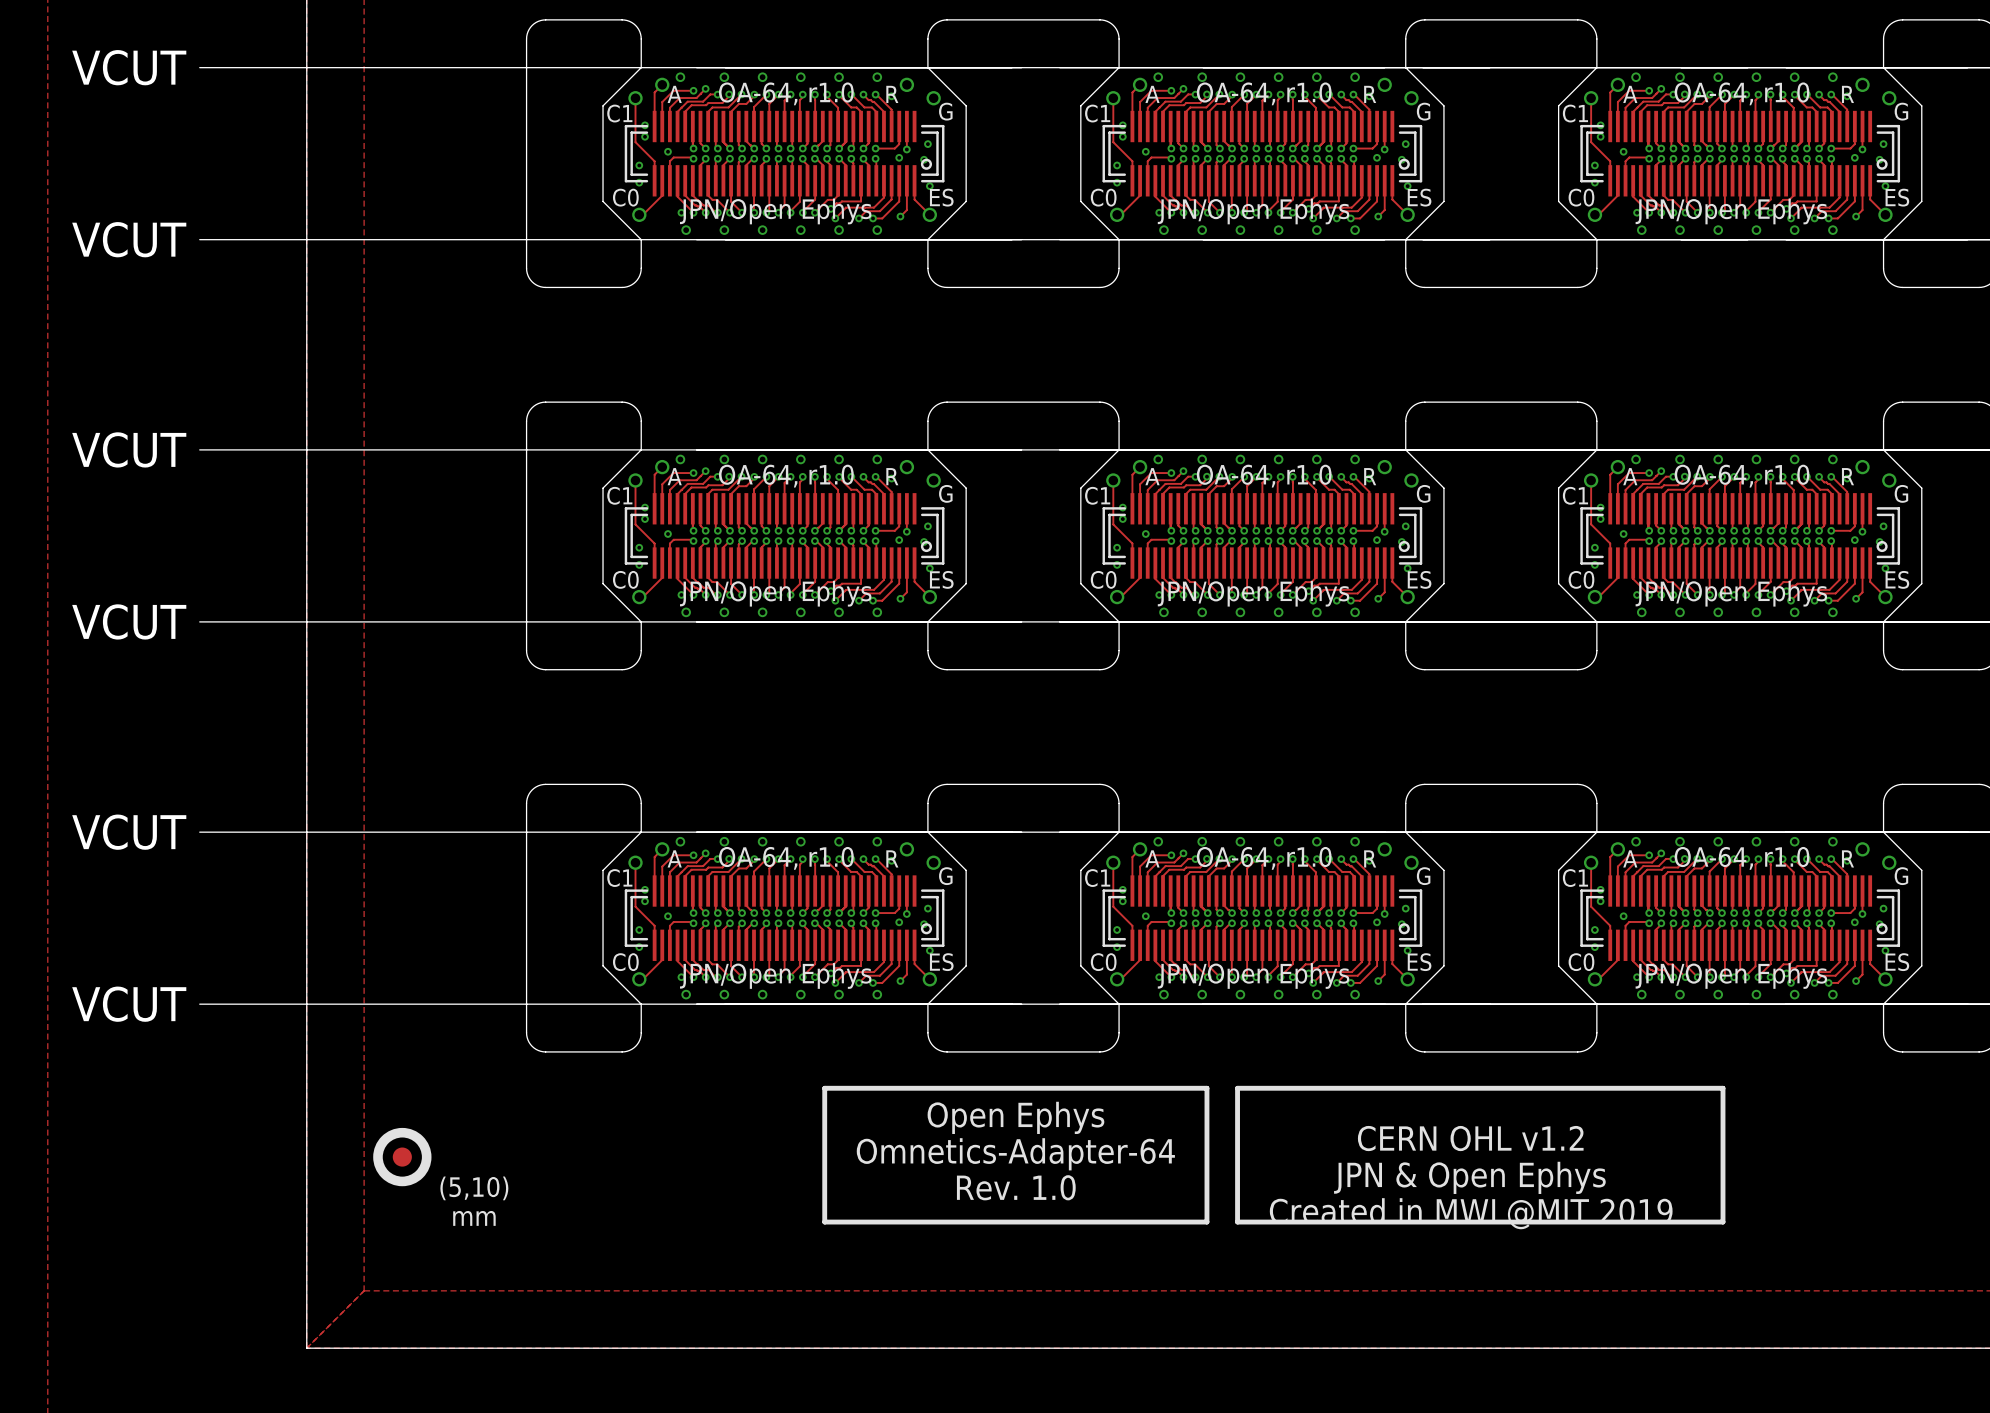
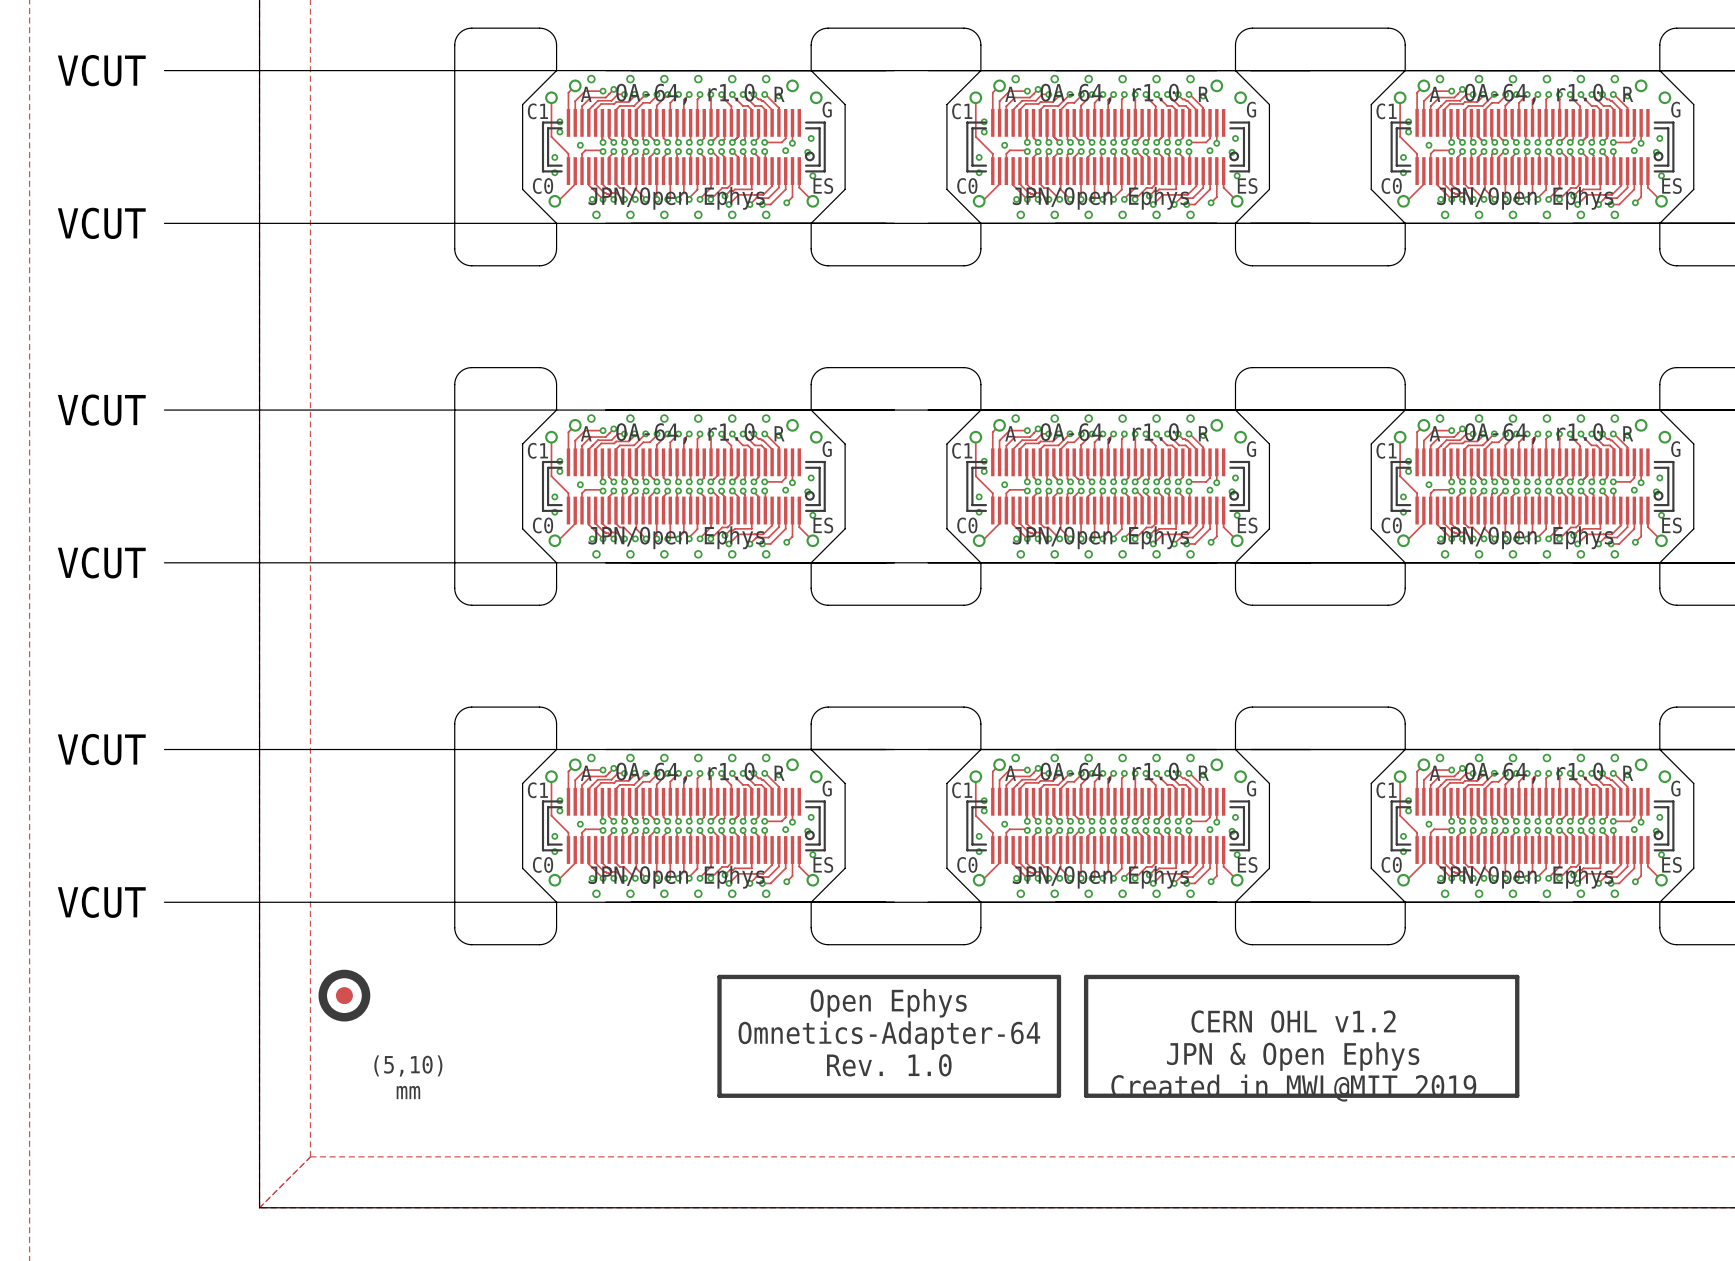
drawing position: (402, 1157) -> (344, 995)

